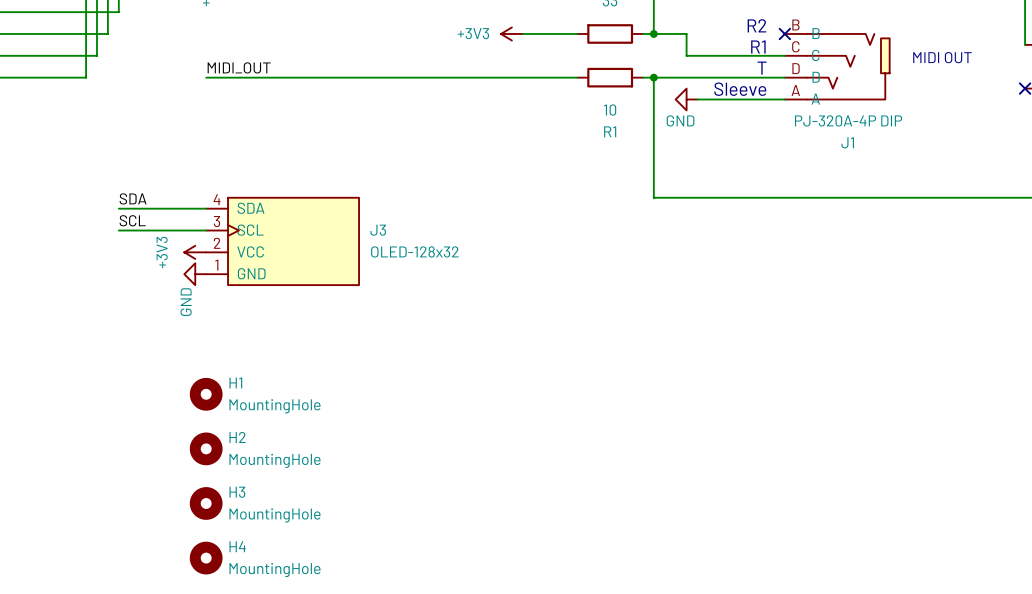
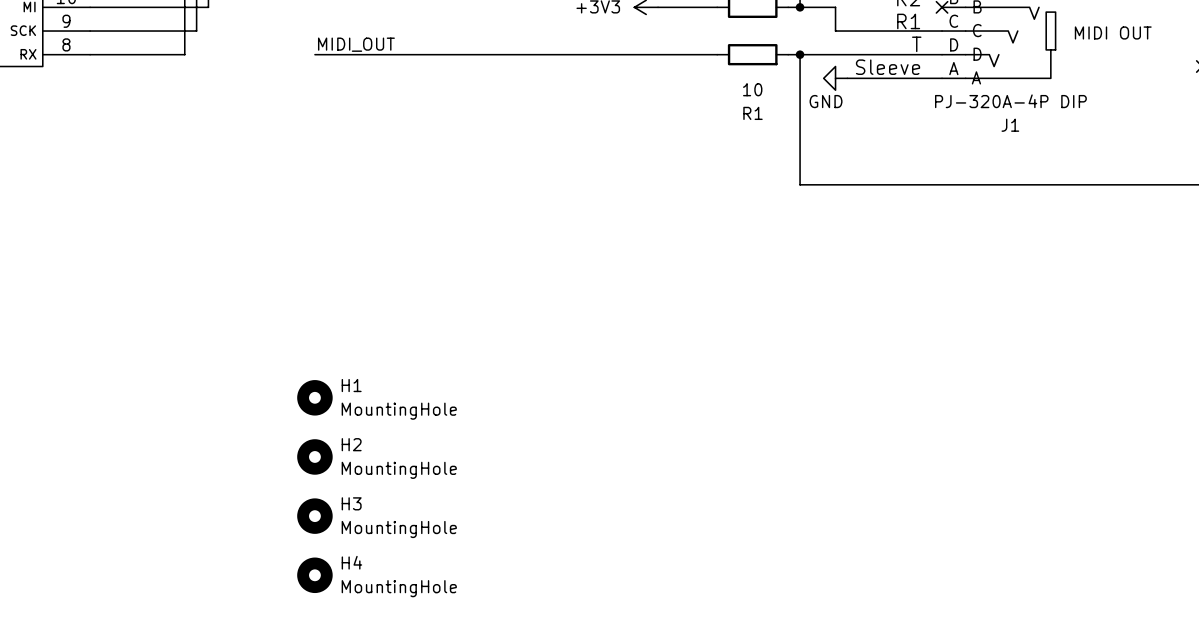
label: SDA (133, 198) -> none
wire: (118, 208) (206, 208) -> none
label: SCL (132, 220) -> none
wire: (118, 230) (206, 230) -> none
J3: OLED-128x32 (282, 241) -> none
power symbol: +3V3 (195, 252) -> none
power symbol: GND (195, 274) -> none

